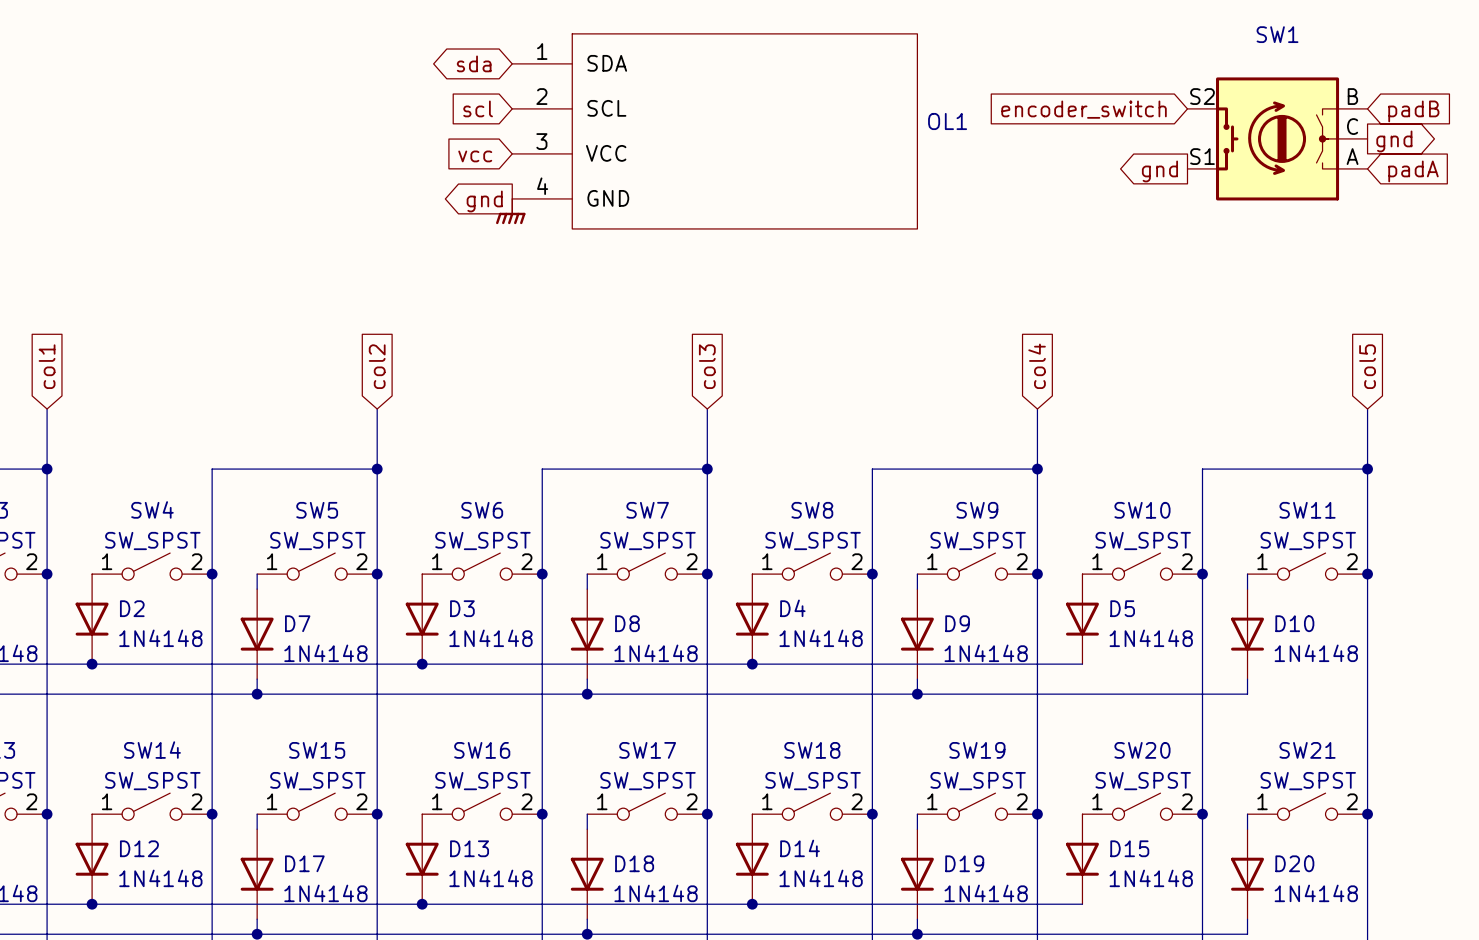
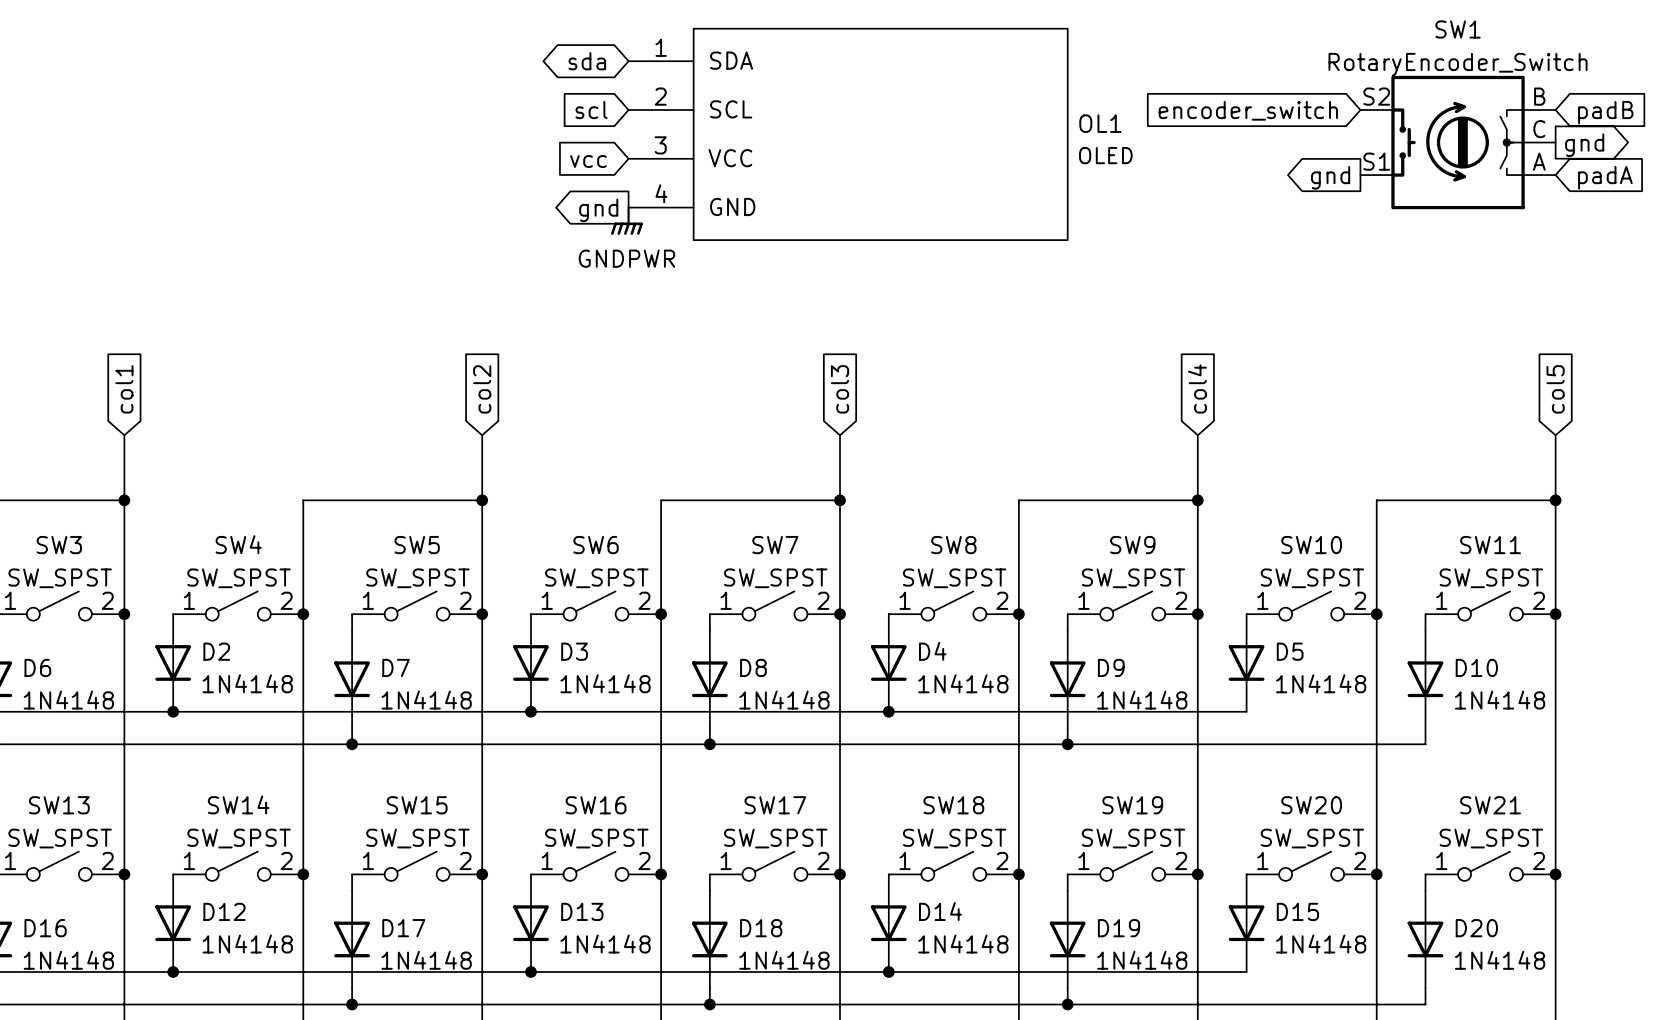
SW1 value: none -> RotaryEncoder_Switch (1458, 64)
OL1 value: none -> OLED (1105, 155)
power symbol text: none -> GNDPWR (626, 258)

